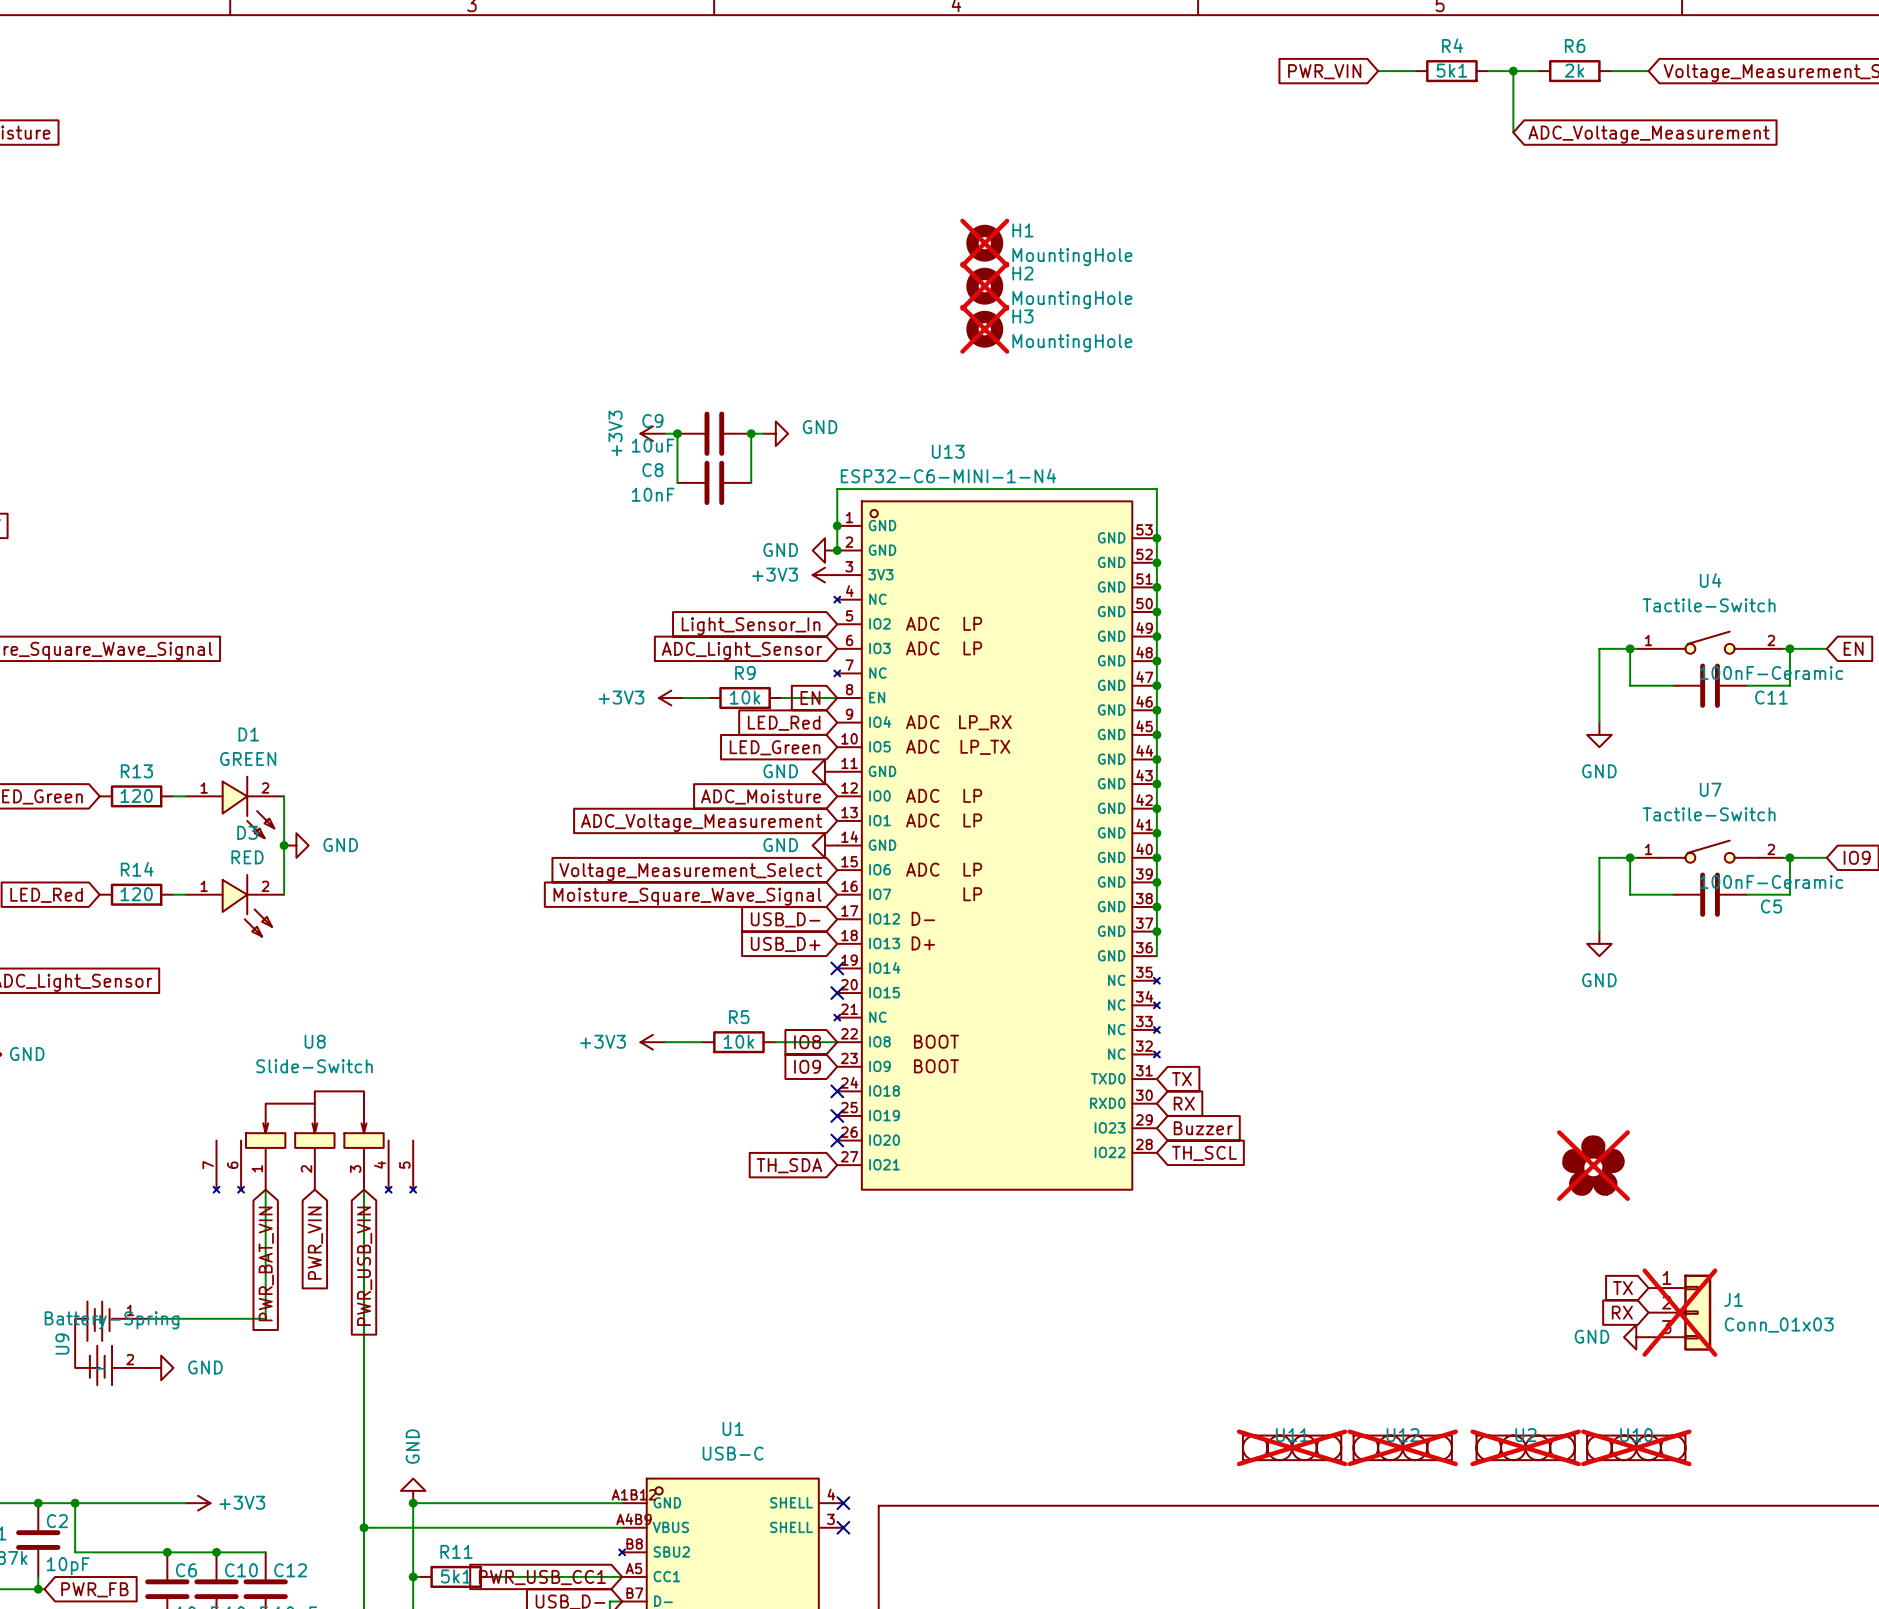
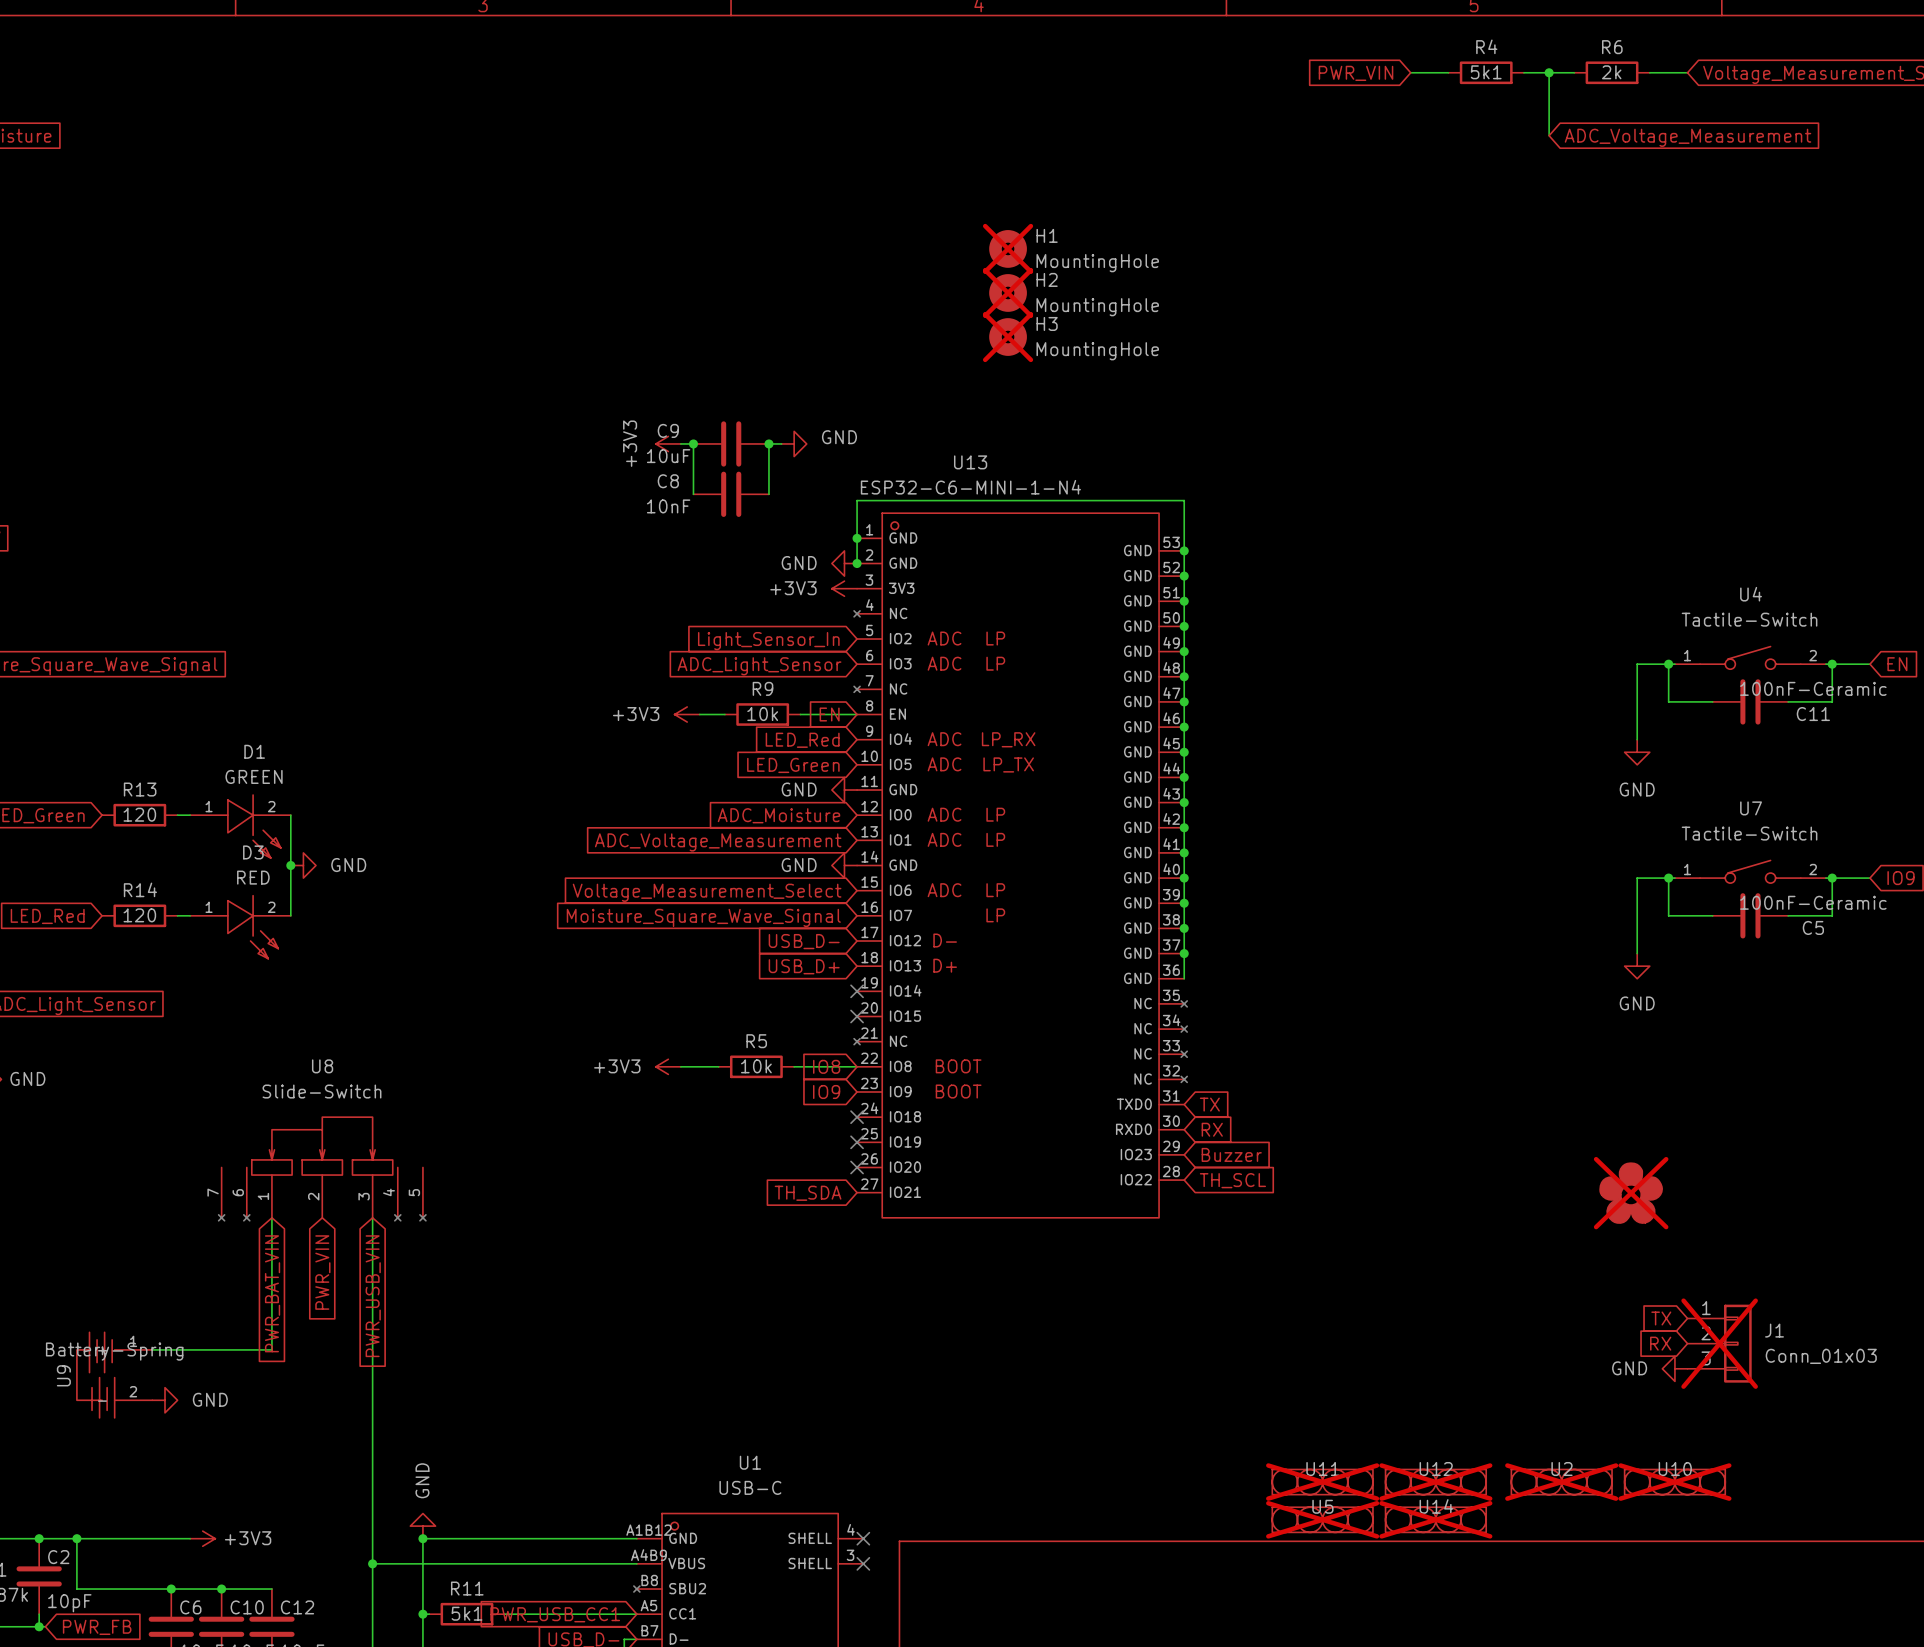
U5: none -> (1322, 1519)
U14: none -> (1435, 1519)

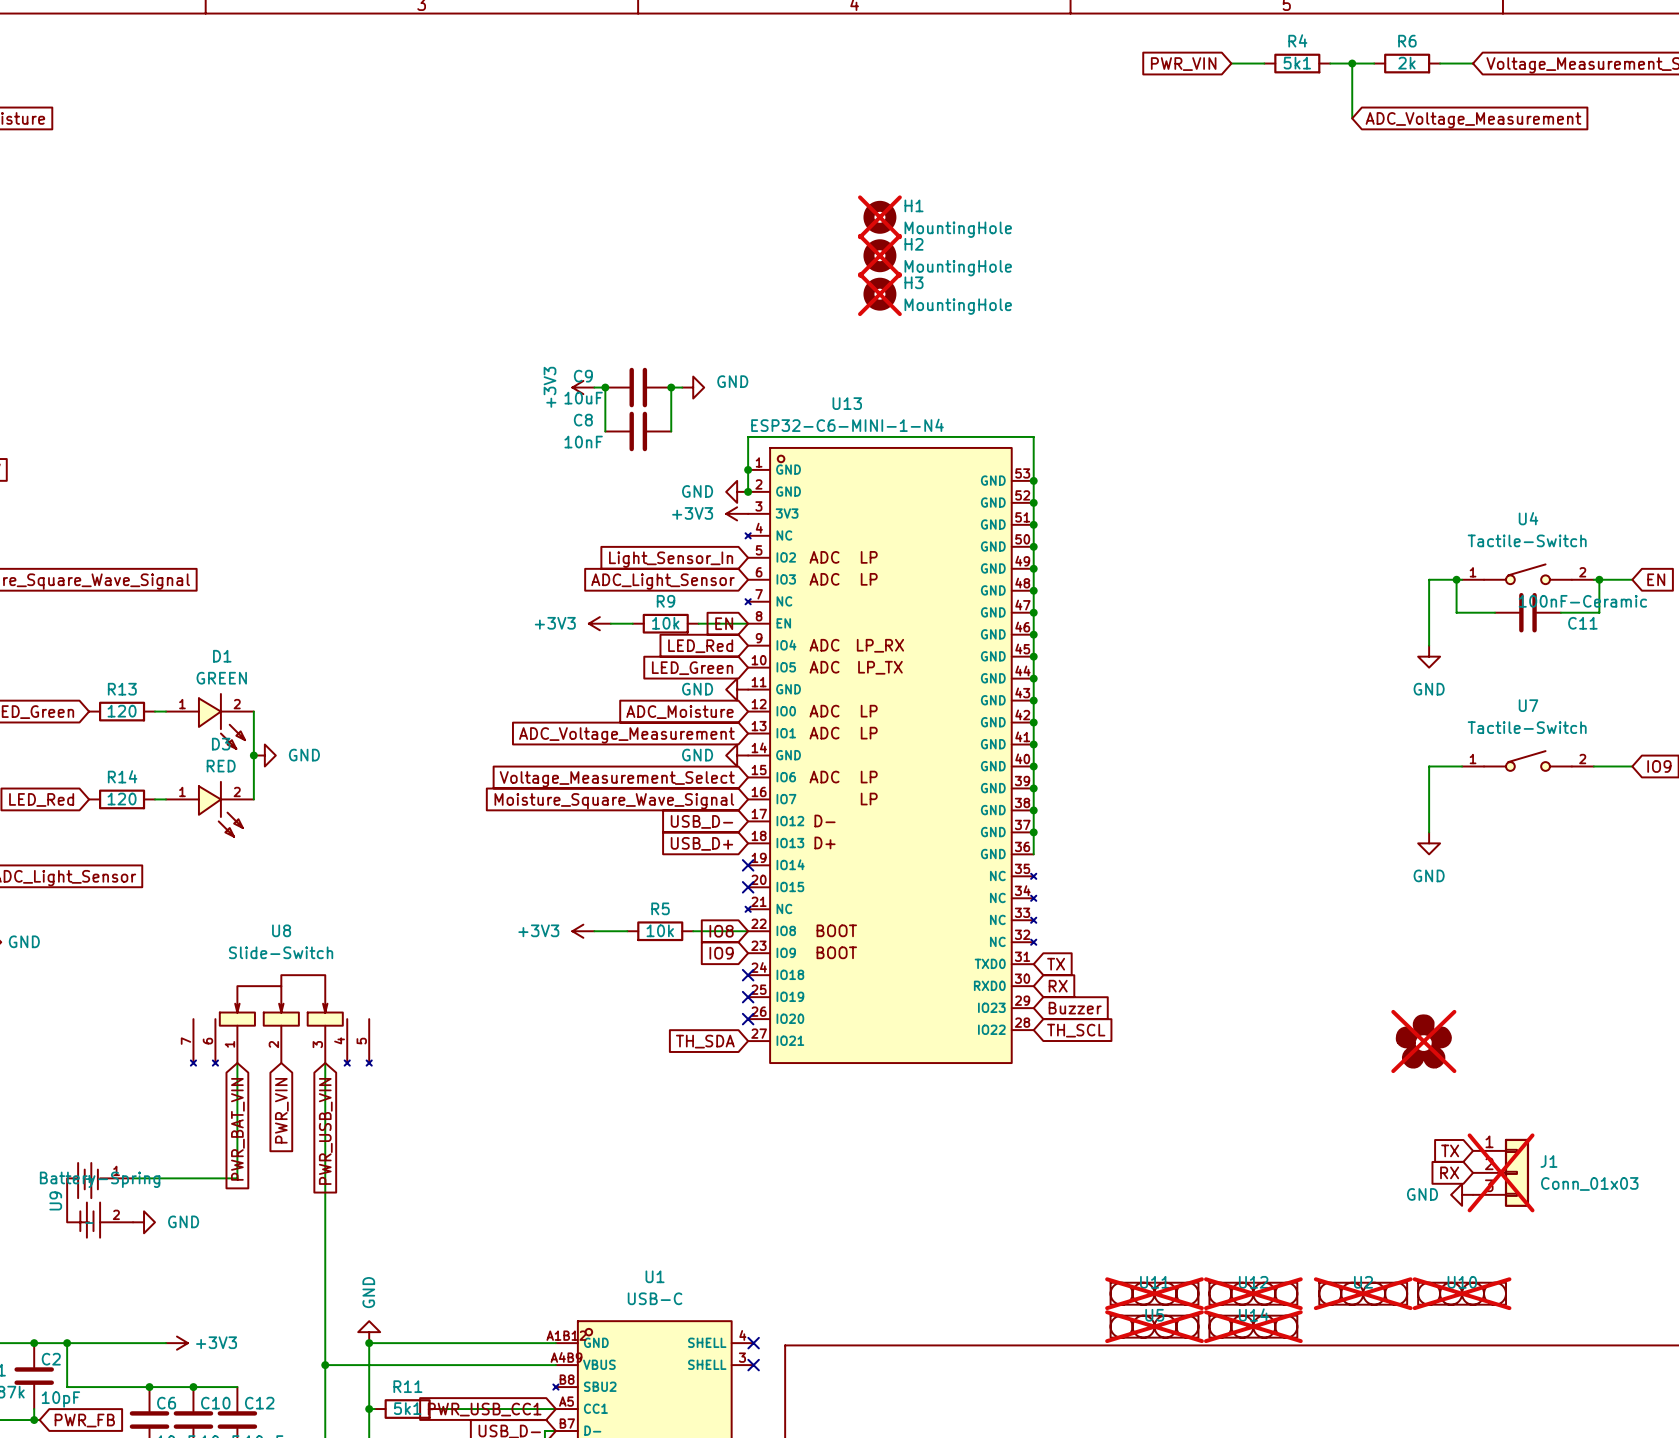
wire: (1668, 878) (1668, 915) (1712, 915) -> none
junction: (1668, 878) -> none
wire: (1832, 878) (1832, 915) (1788, 915) -> none
junction: (1832, 878) -> none
C5: 100nF-Ceramic (1750, 915) -> none

